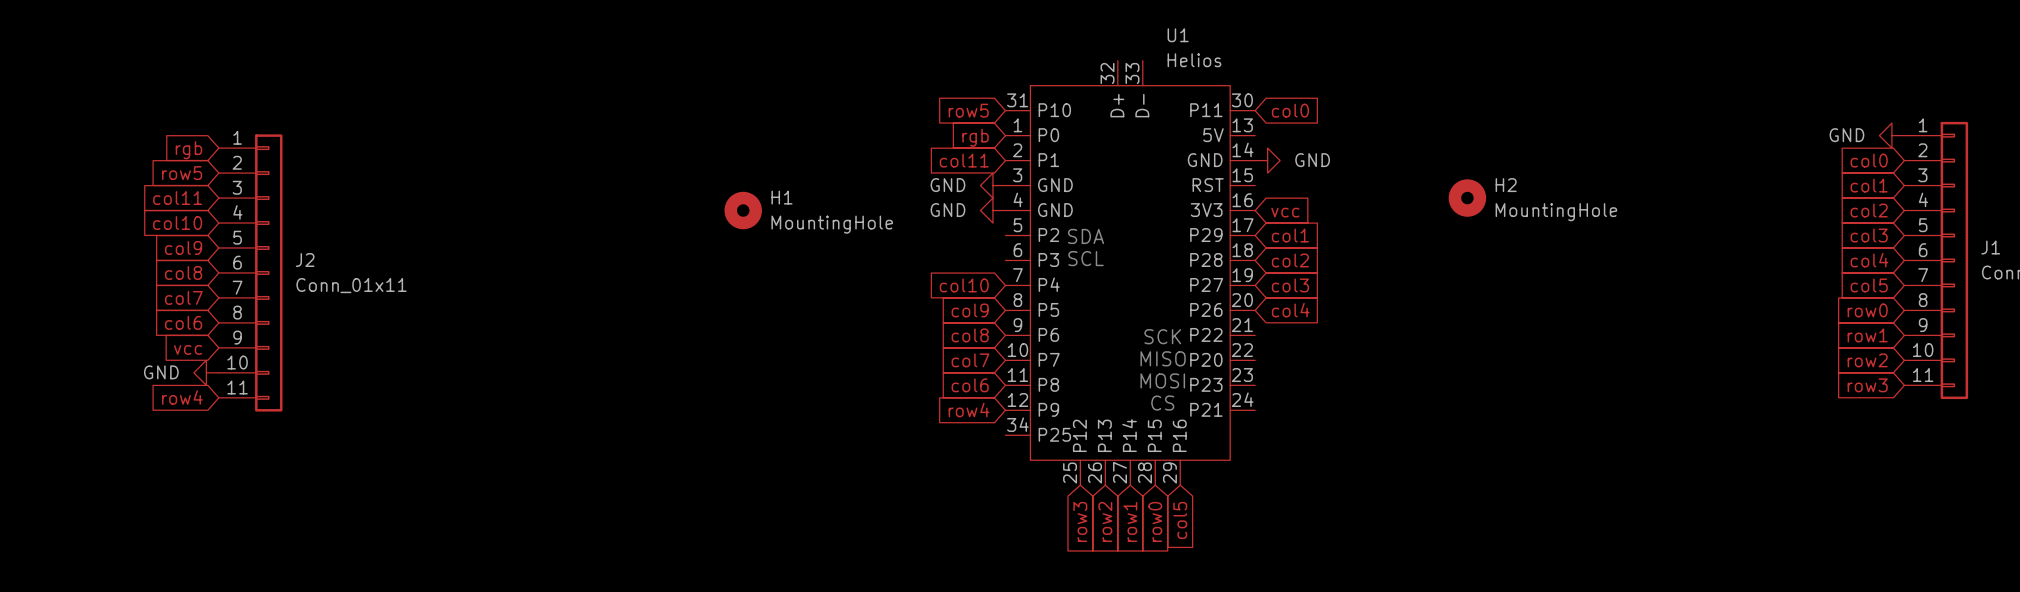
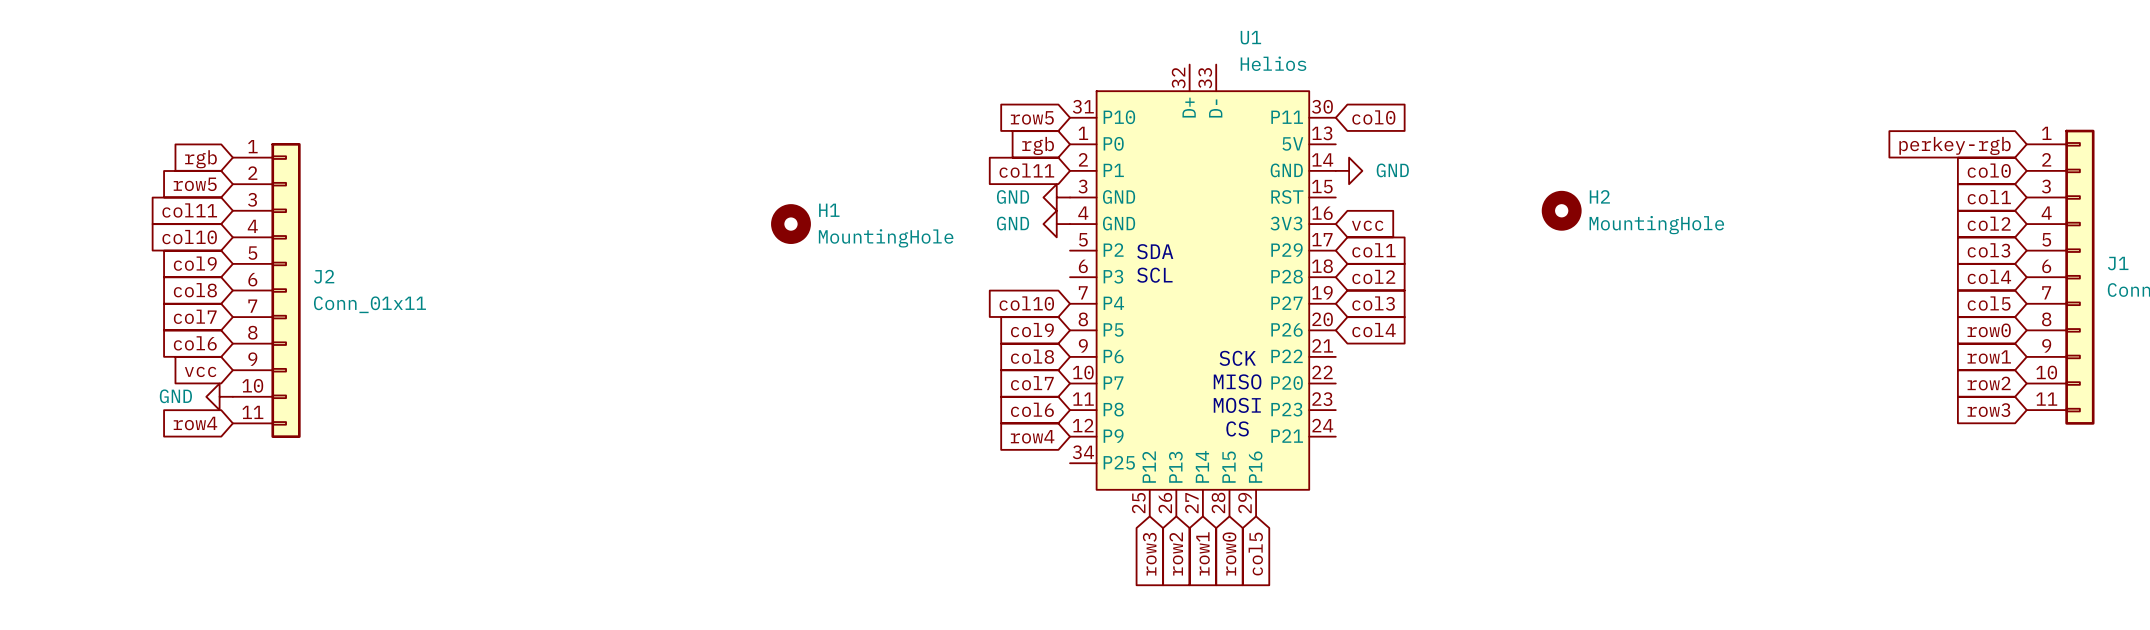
power symbol: GND (1891, 135) -> none
global label: none -> perkey-rgb (1955, 145)

